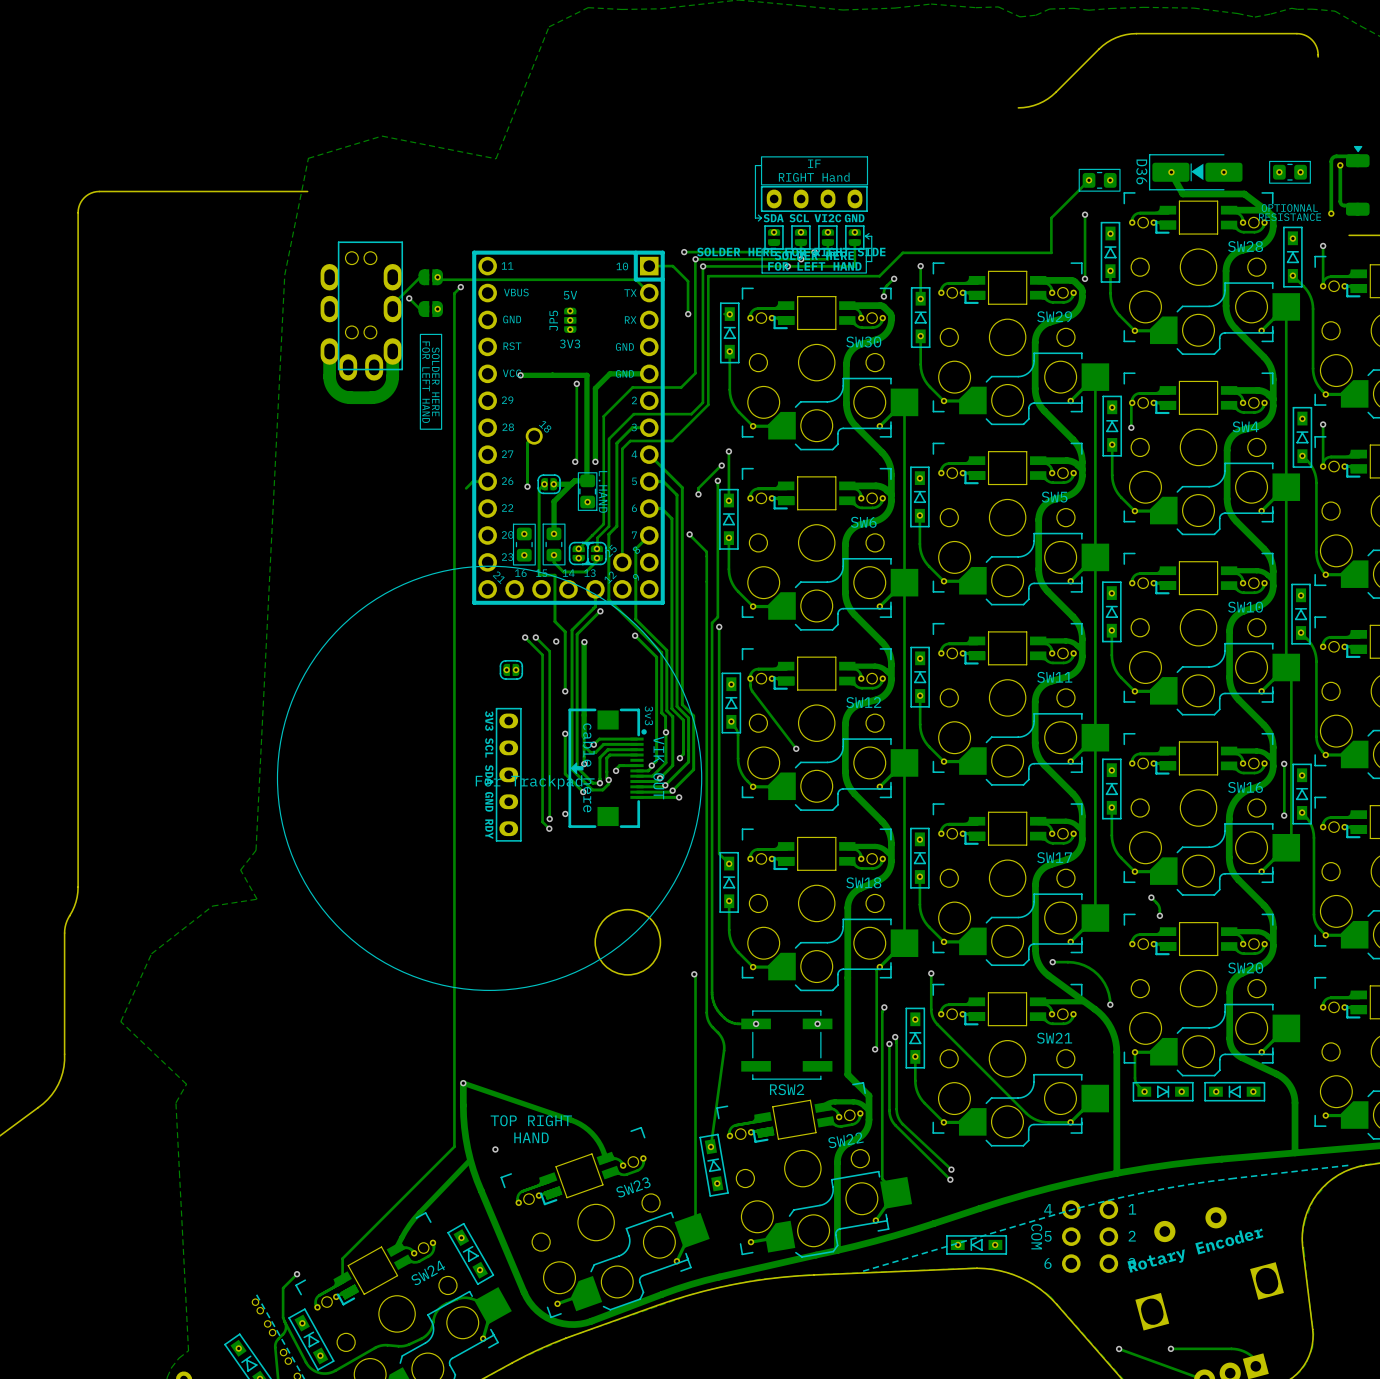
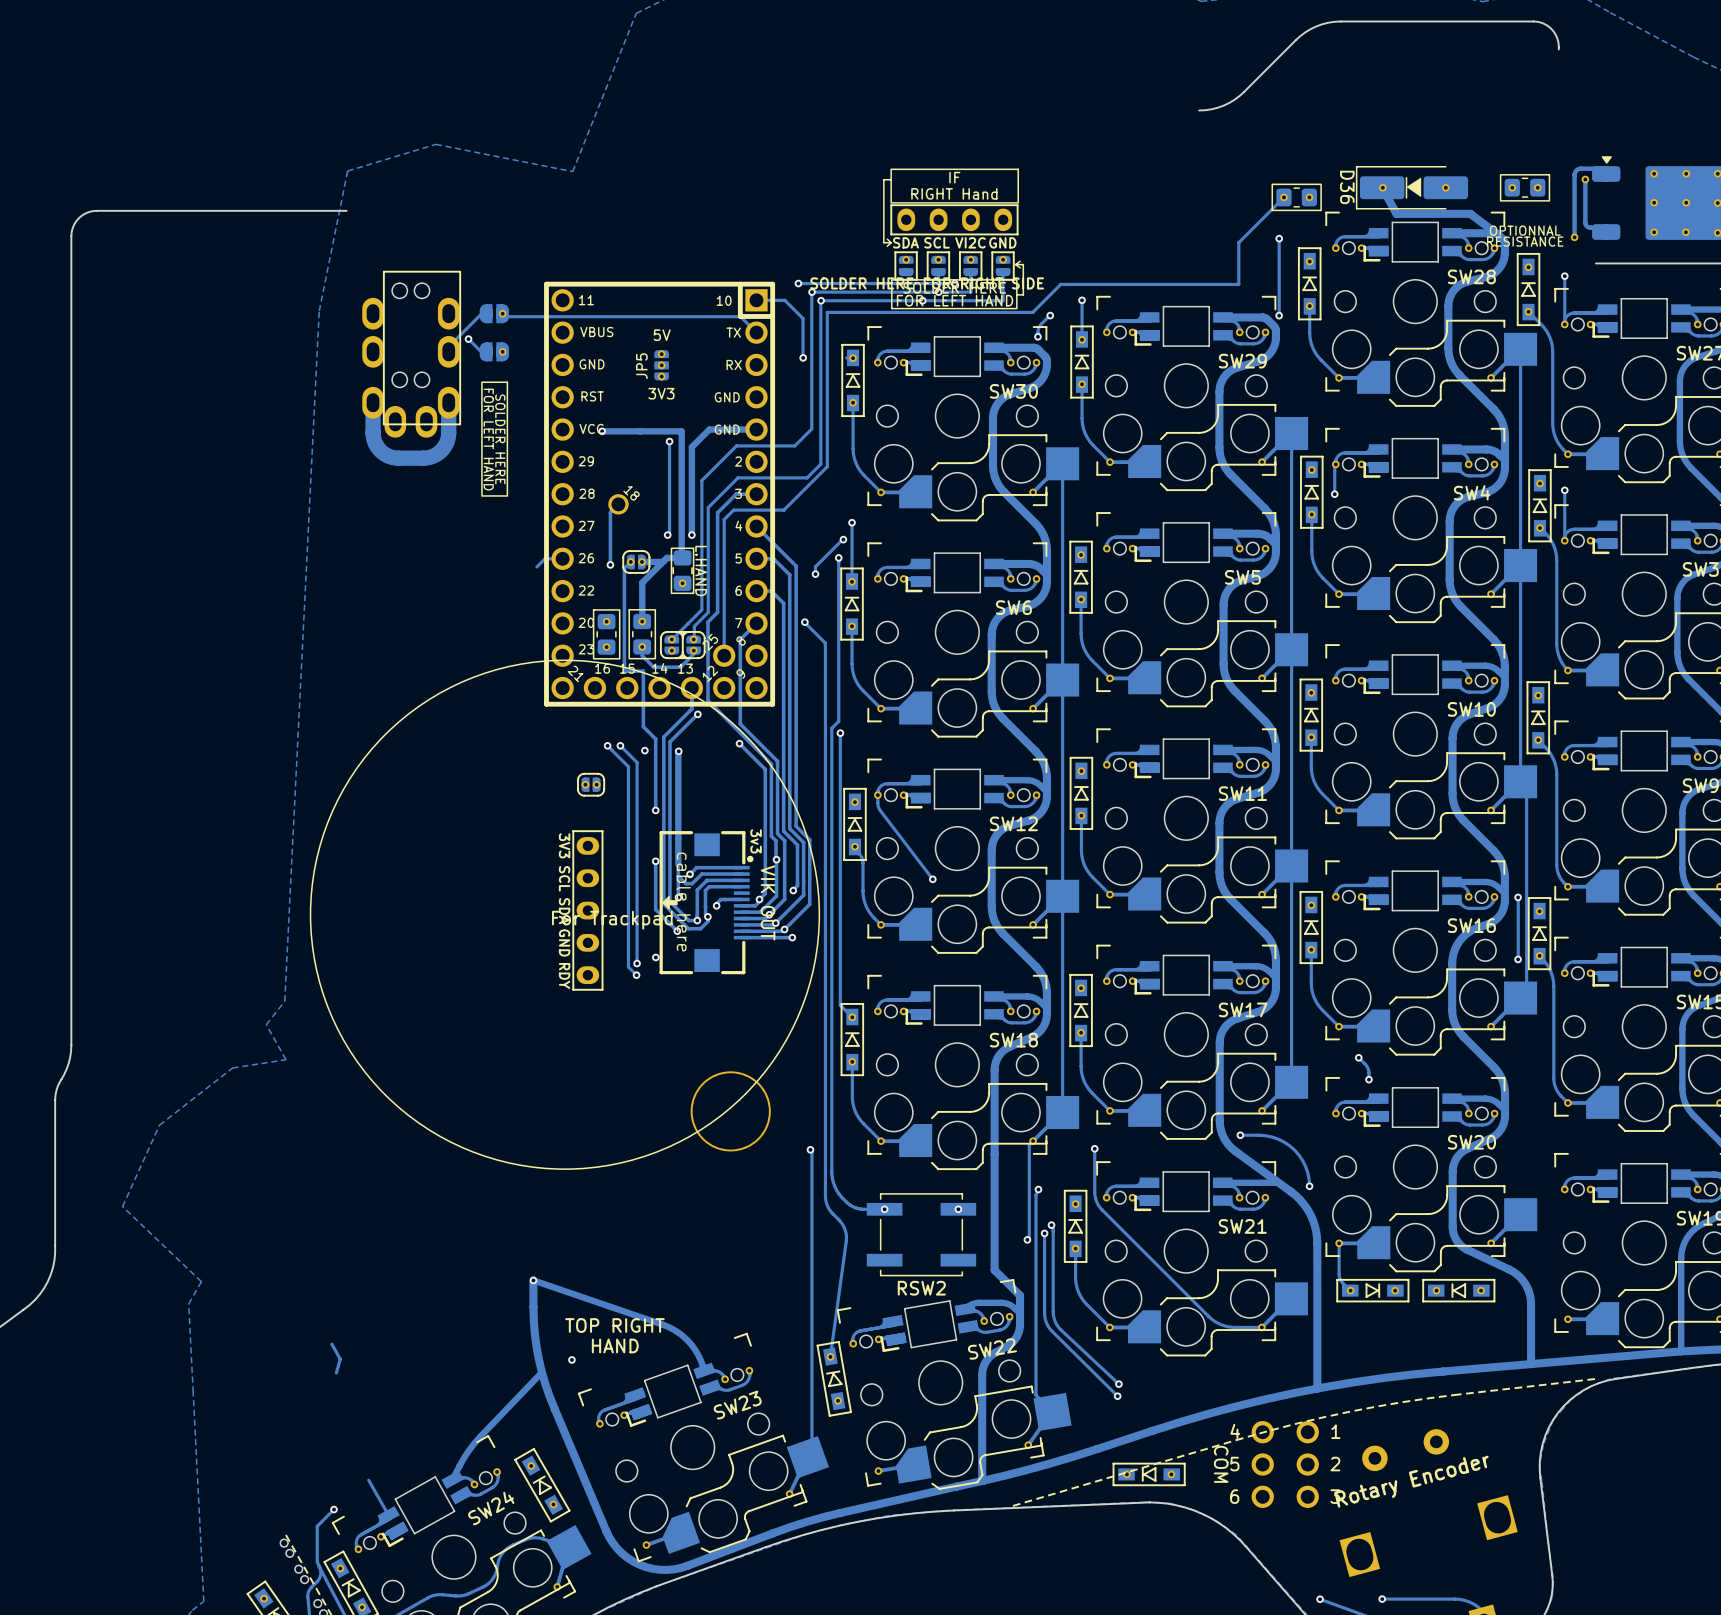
track: (460, 287) (454, 293) (454, 1146) (342, 1258) (342, 1279) -> (368, 1480) (388, 1515)
via: (460, 287) -> none
track: none -> (331, 1344) (340, 1359) (336, 1372)

